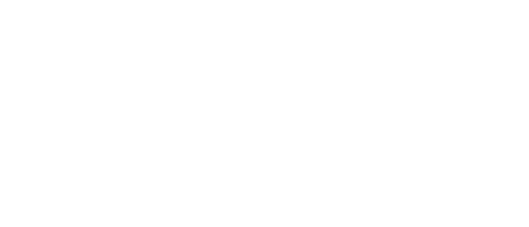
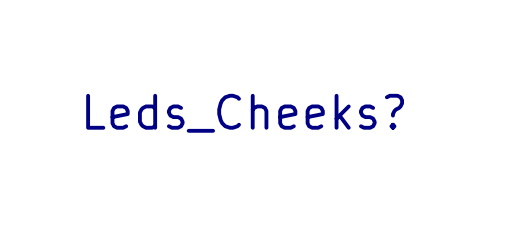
text: none -> Leds_Cheeks? (245, 113)

